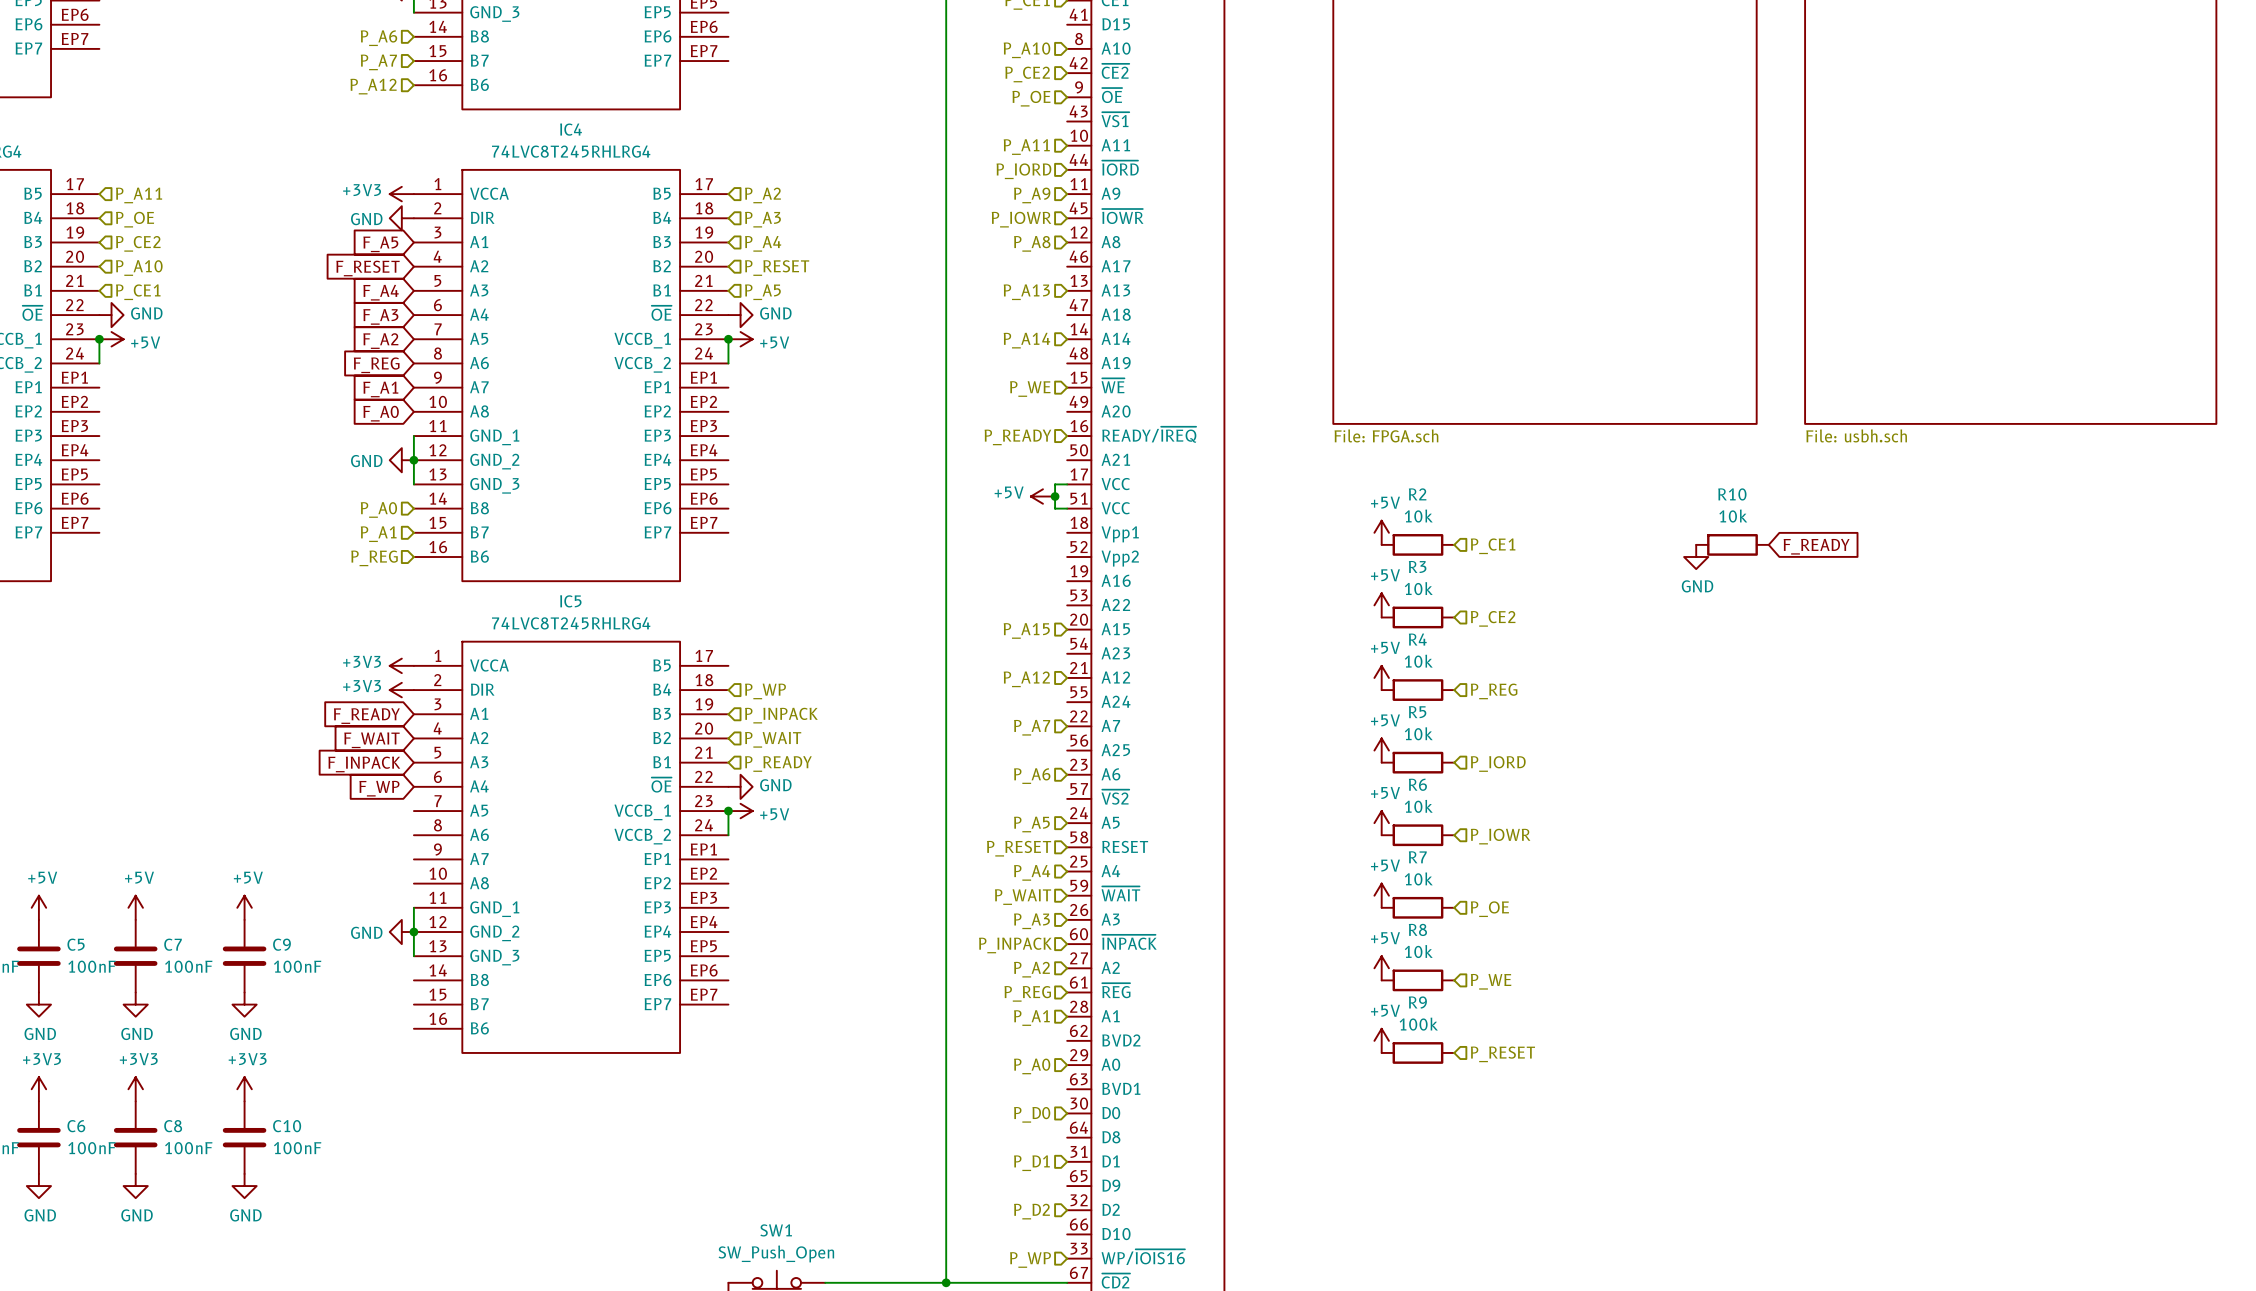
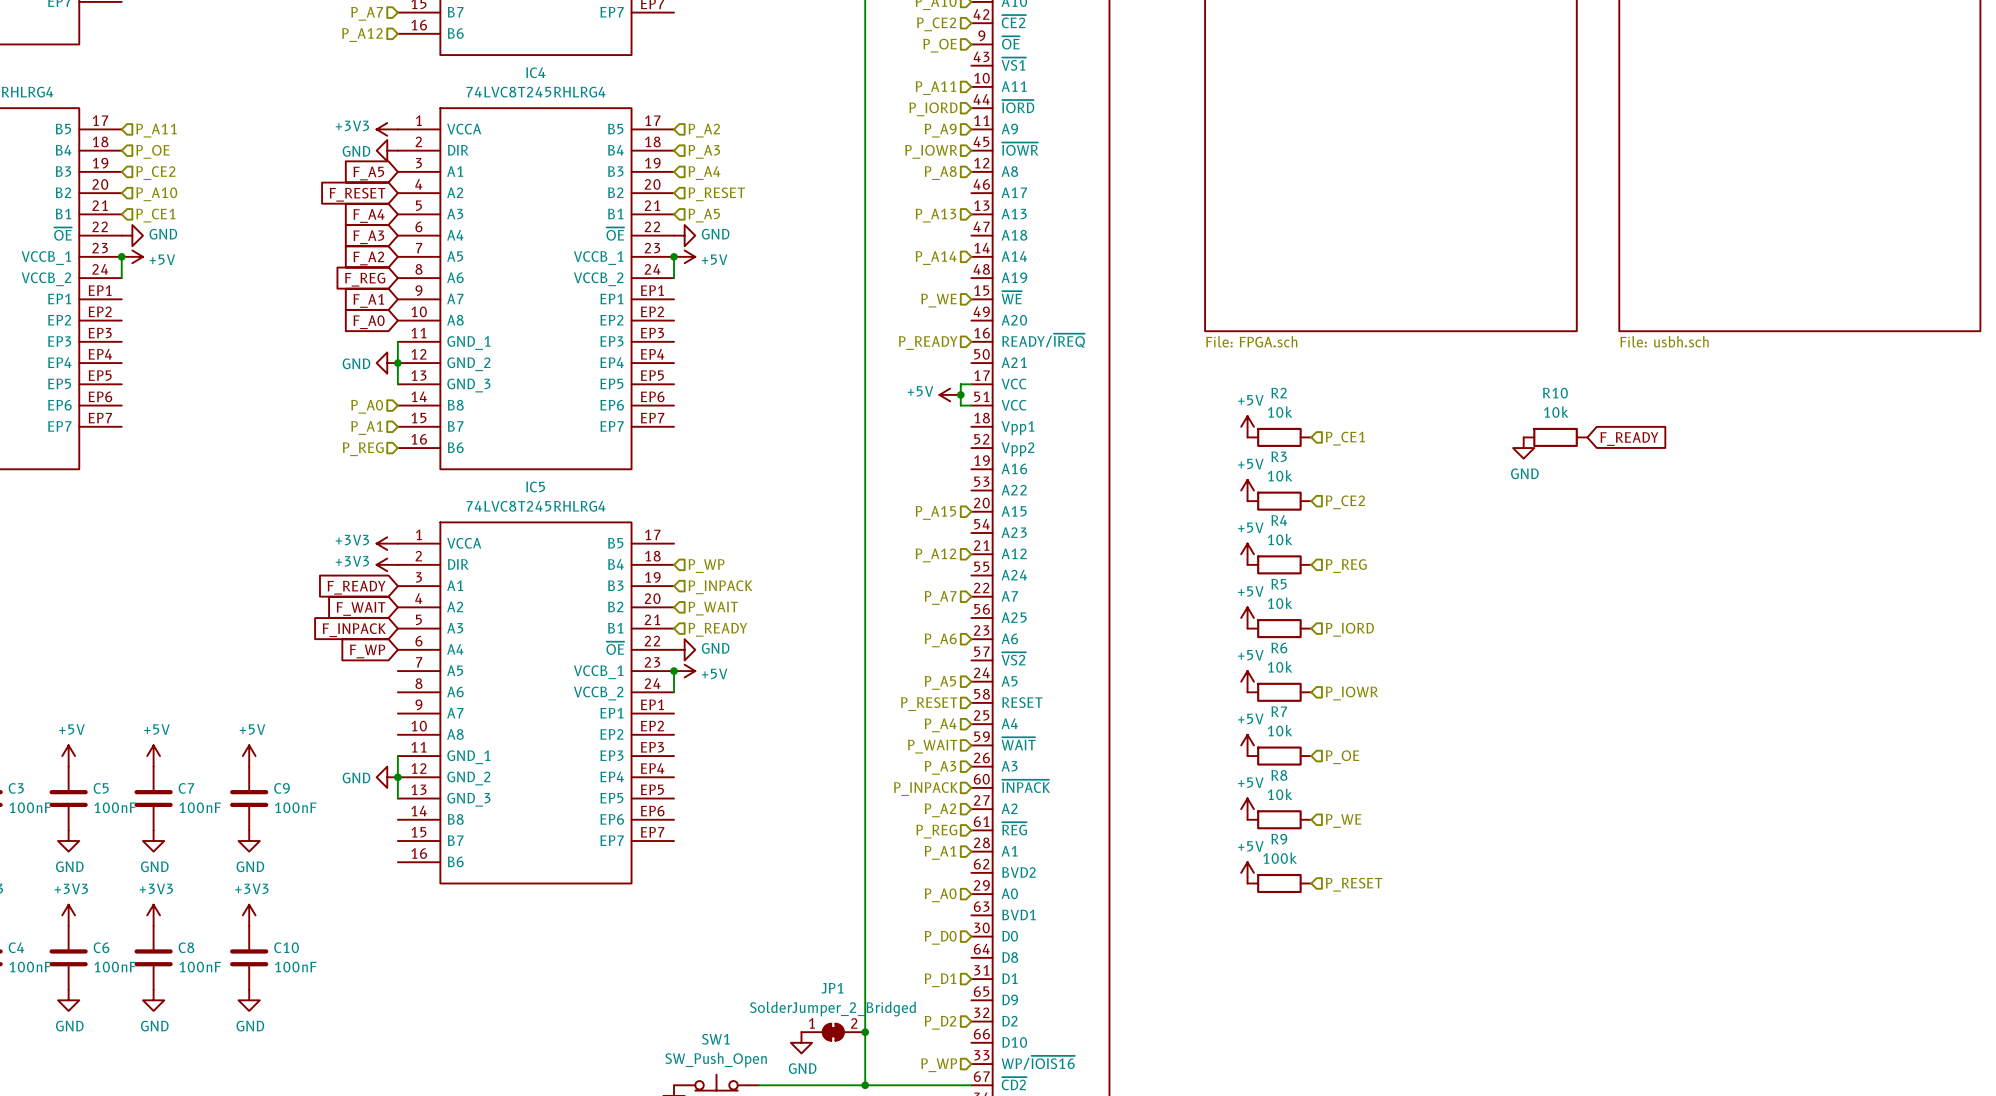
JP1: none -> SolderJumper_2_Bridged (833, 1032)
junction: none -> (865, 1032)
power symbol: none -> GND (801, 1042)

